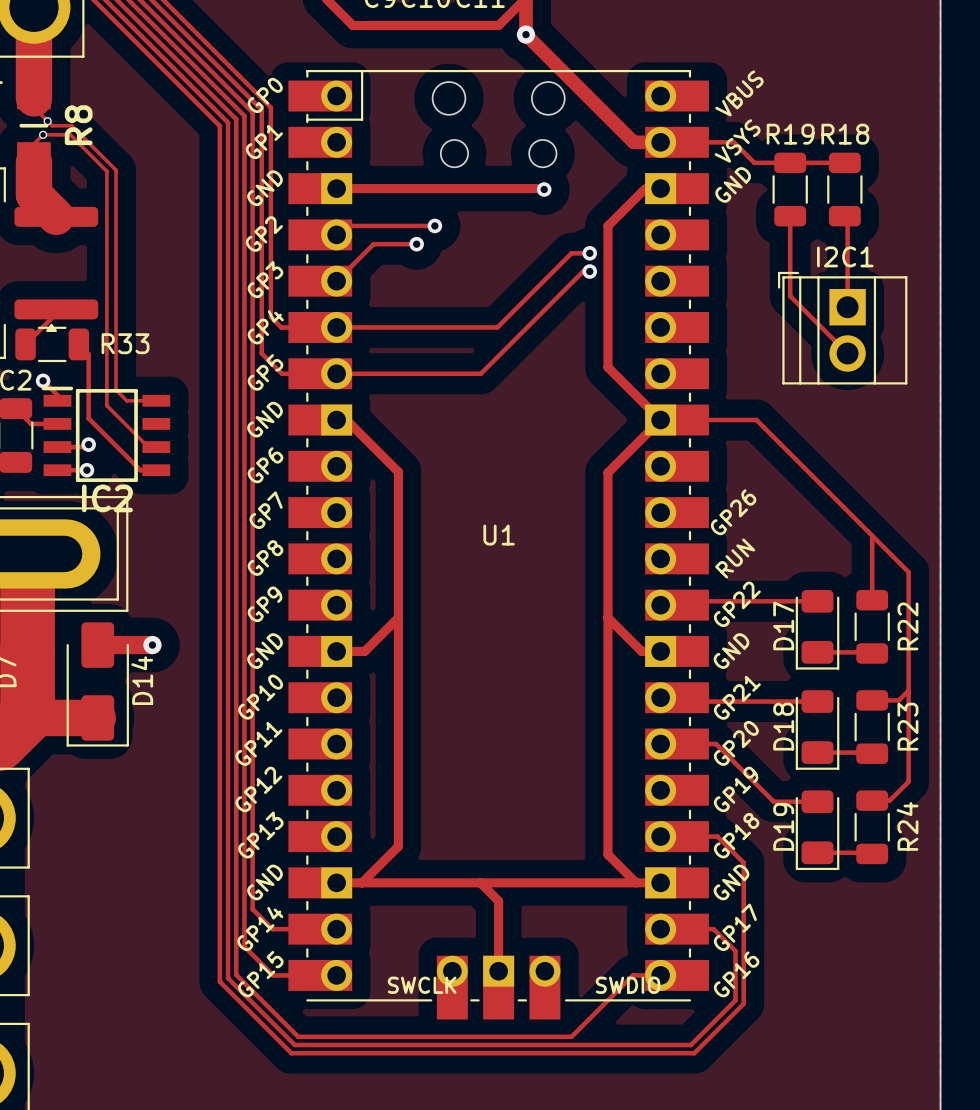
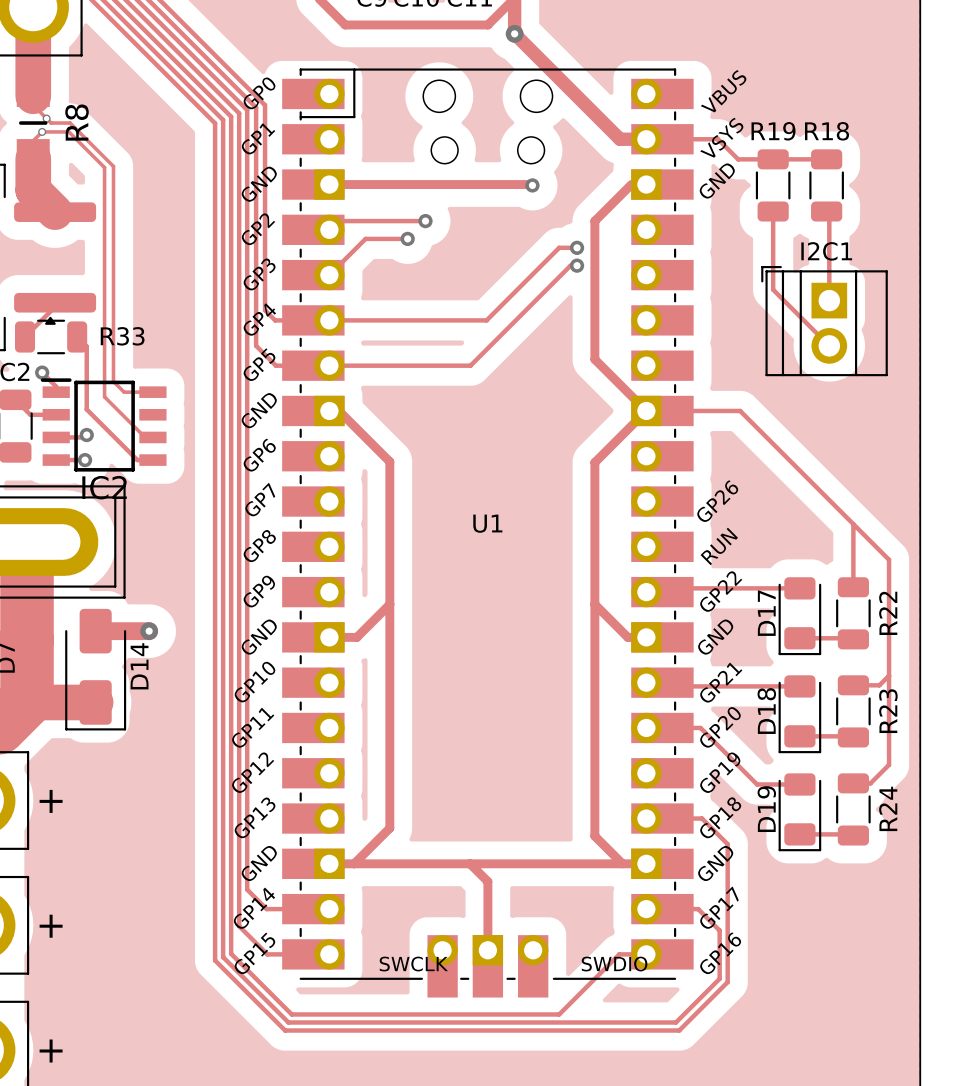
part text: none -> + (51, 801)
part text: none -> + (51, 926)
part text: none -> + (51, 1051)

